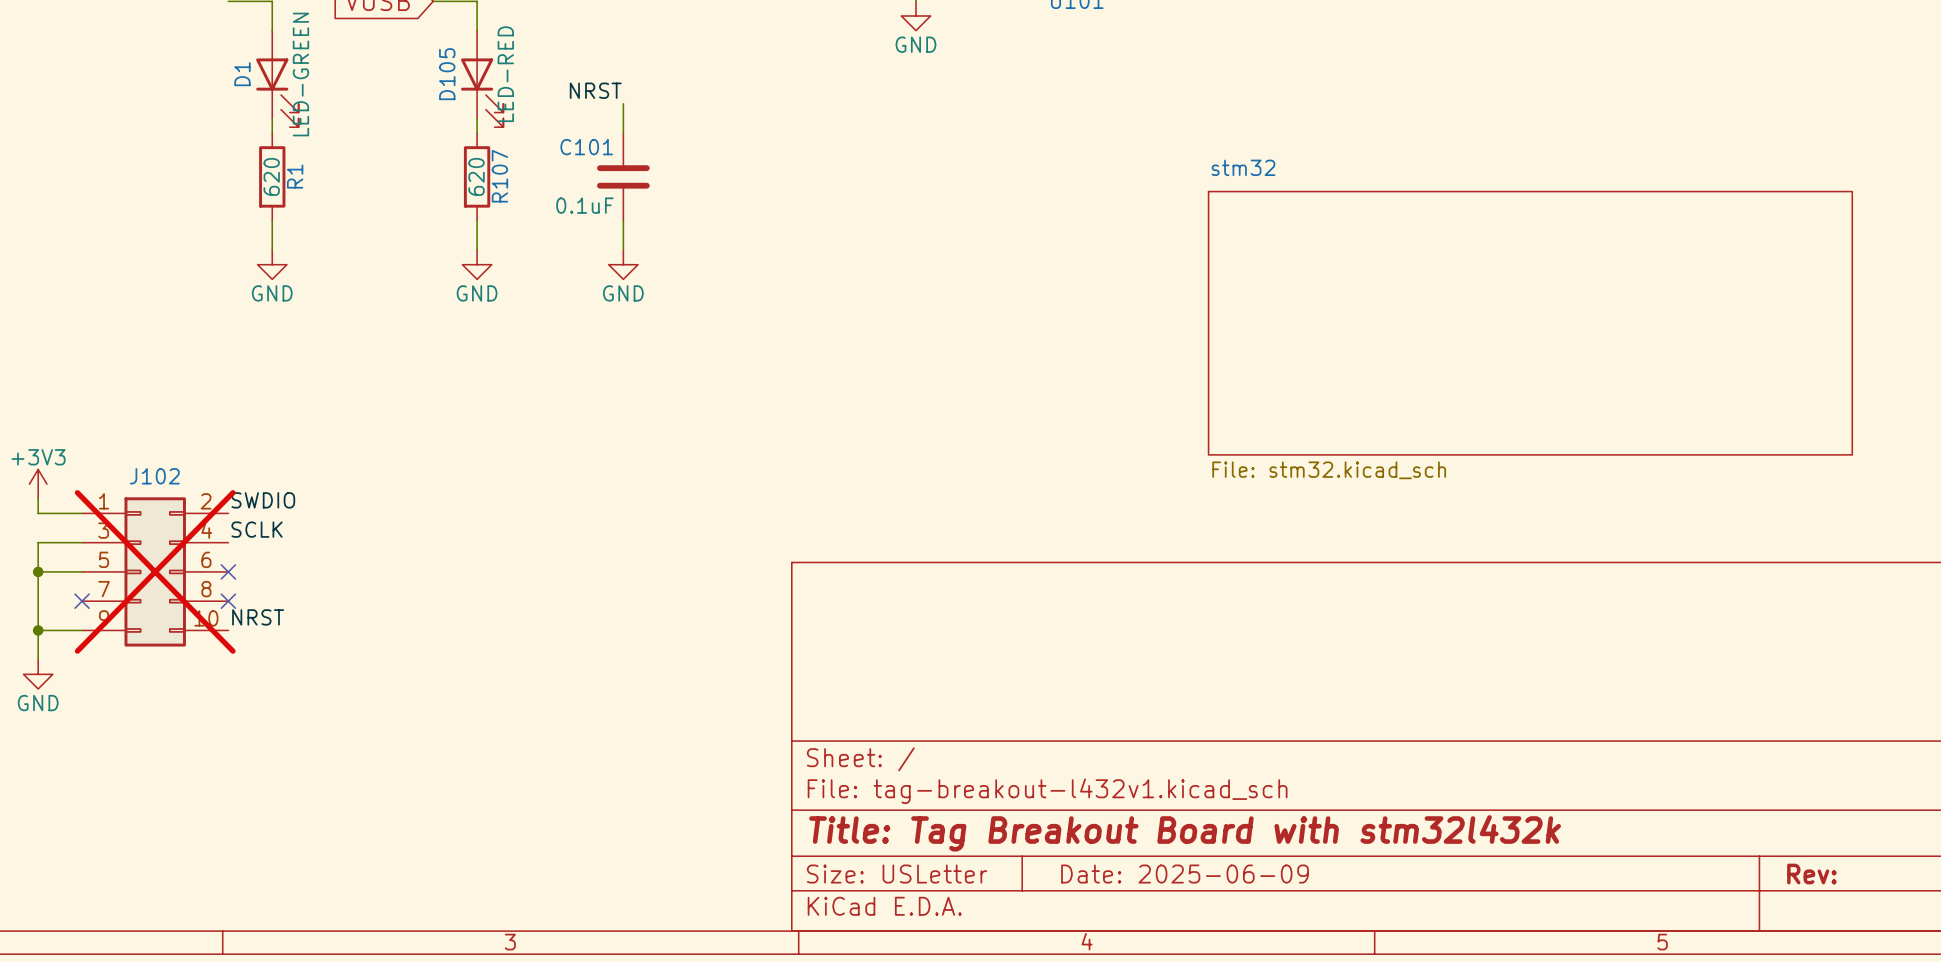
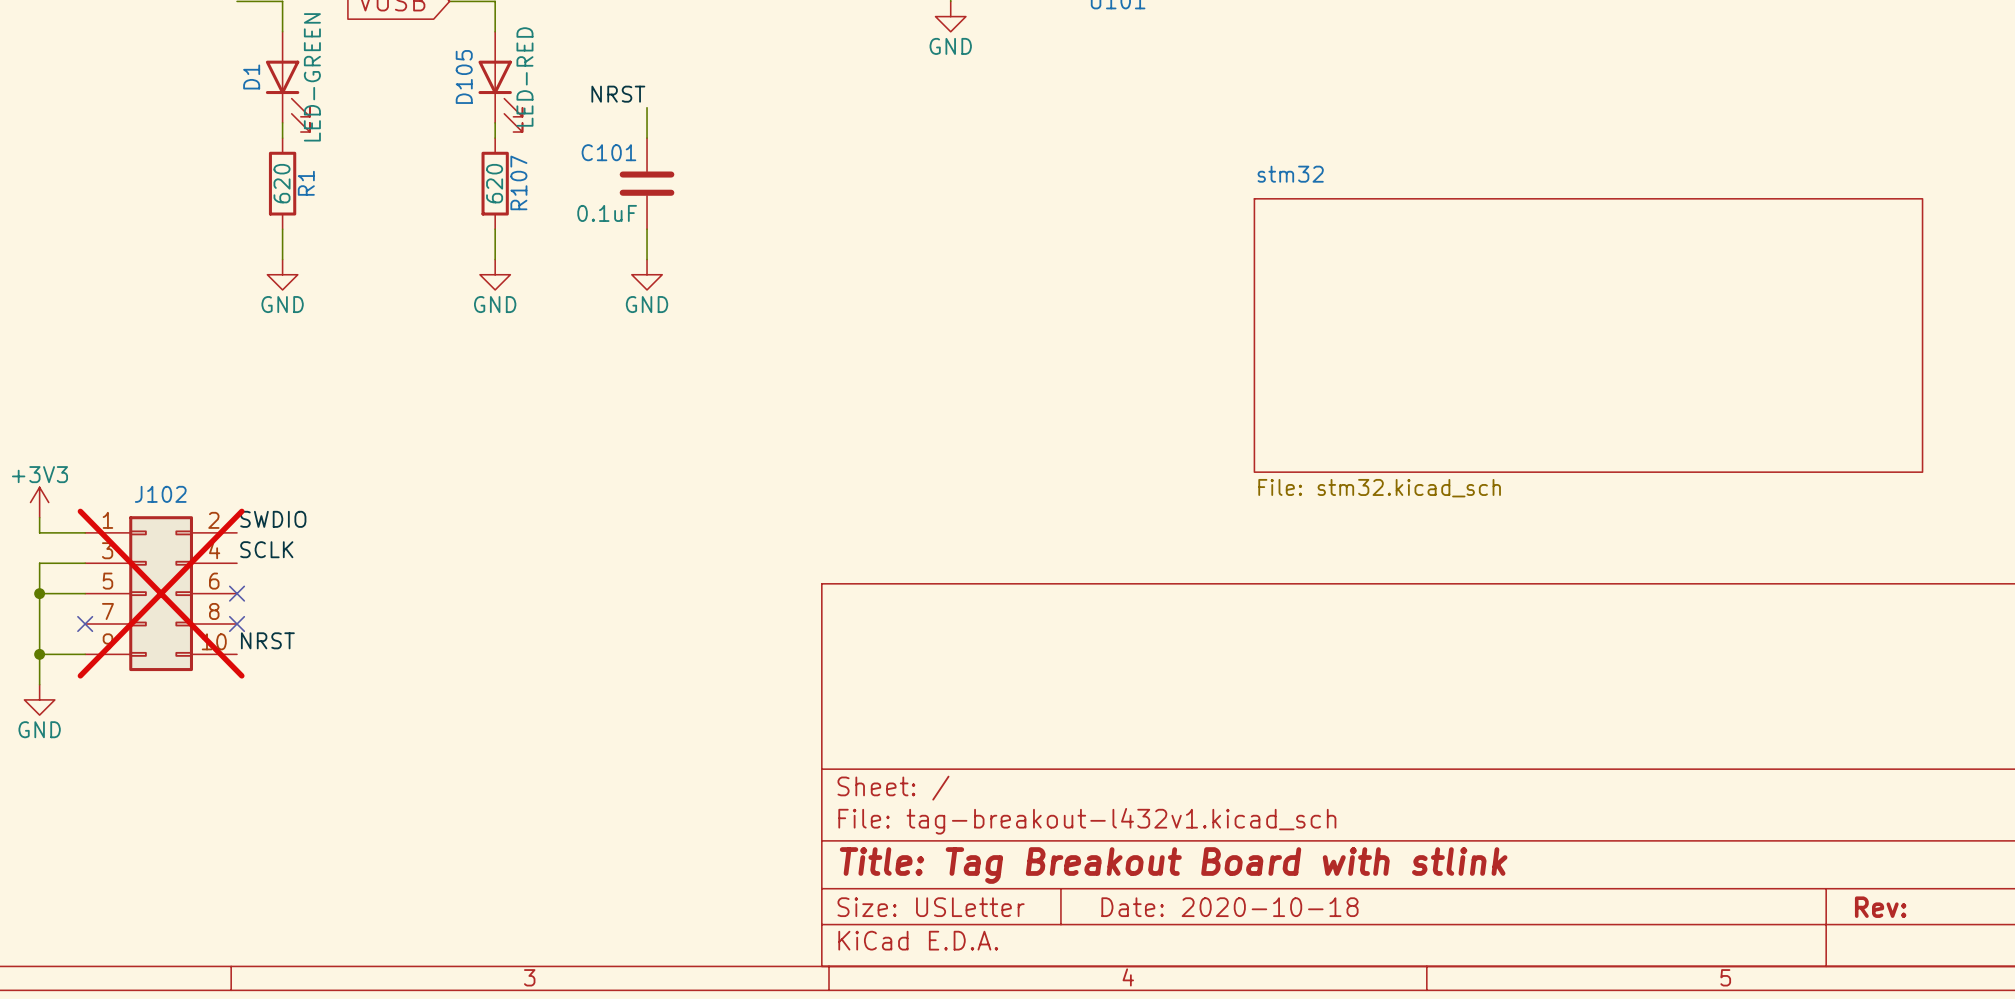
title block: Title: Tag Breakout Board with stm32l432k (1185, 833) -> Title: Tag Breakout Board with stlink (1173, 865)
title block: Date: 2025-06-09 (1185, 874) -> Date: 2020-10-18 (1229, 907)

